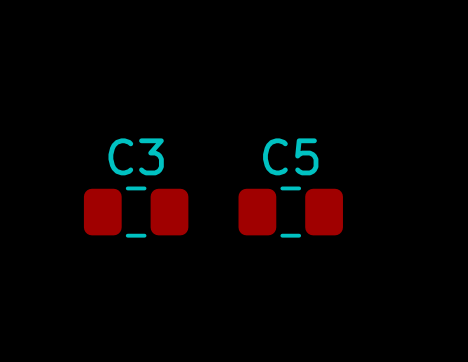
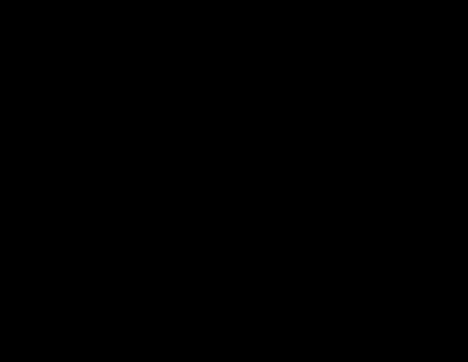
C3: (136, 212) -> none
C5: (290, 212) -> none

